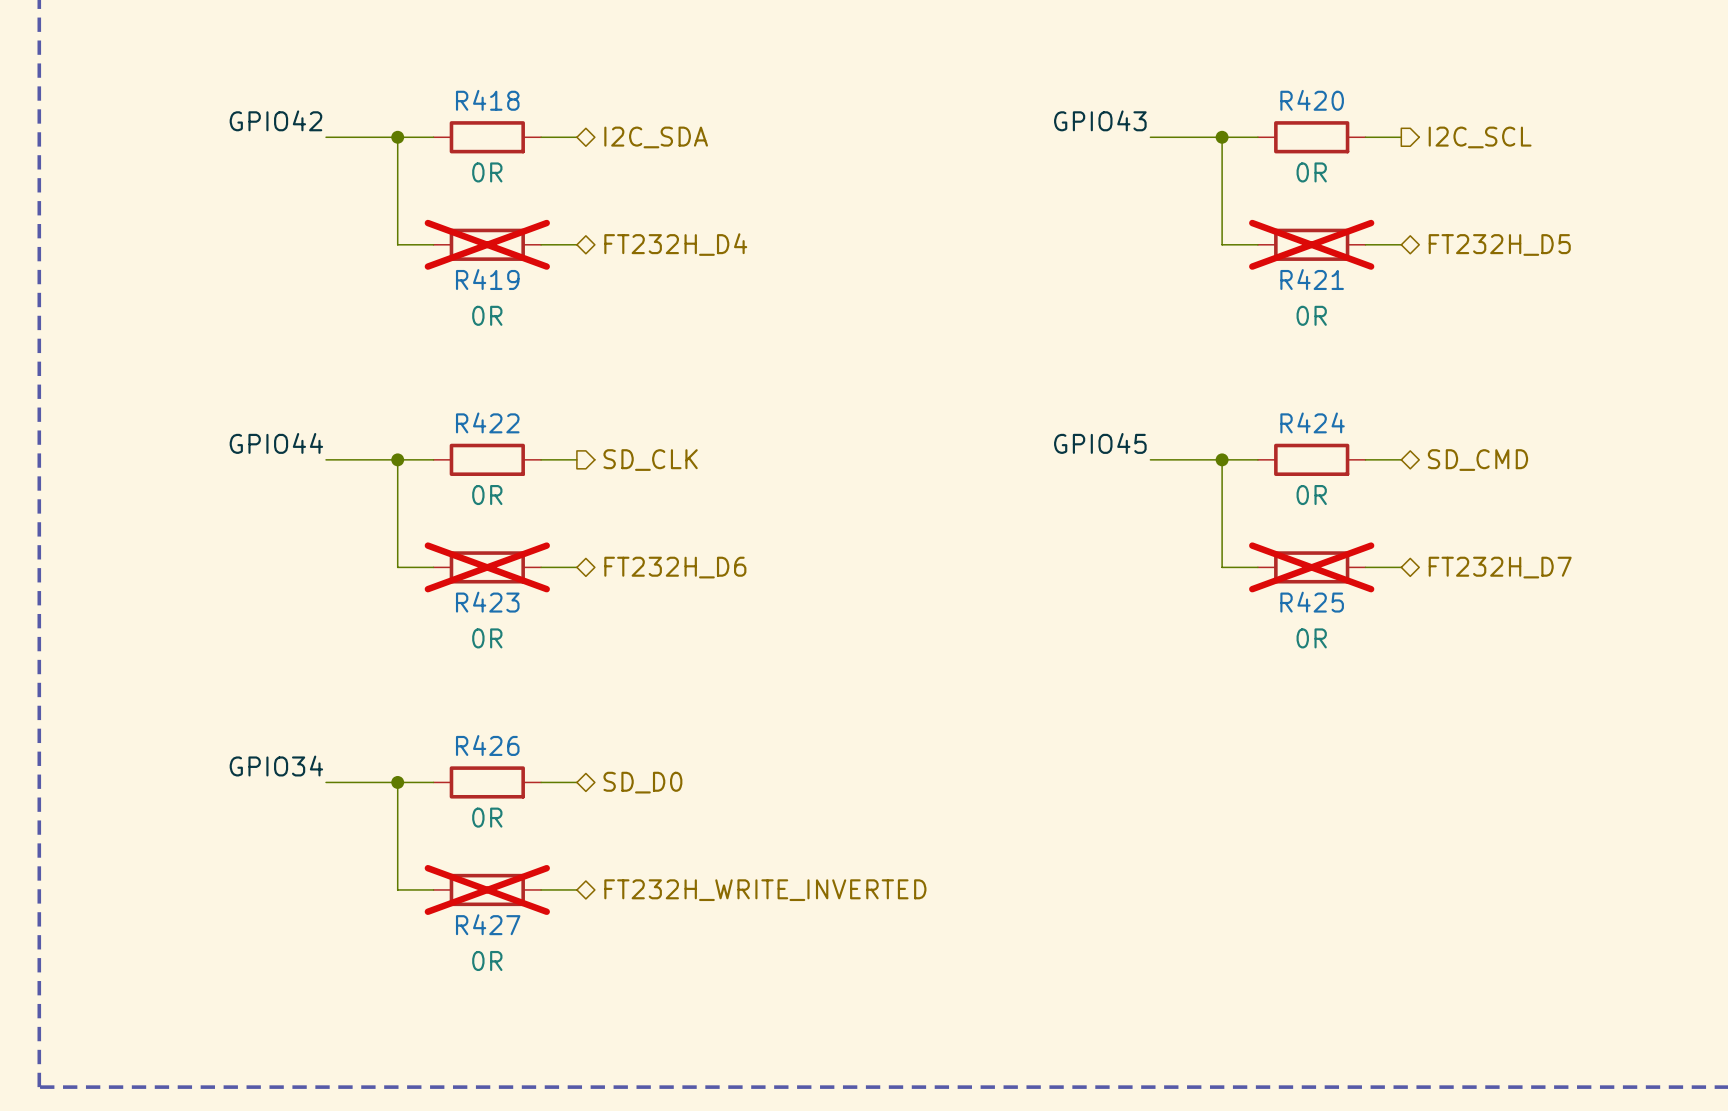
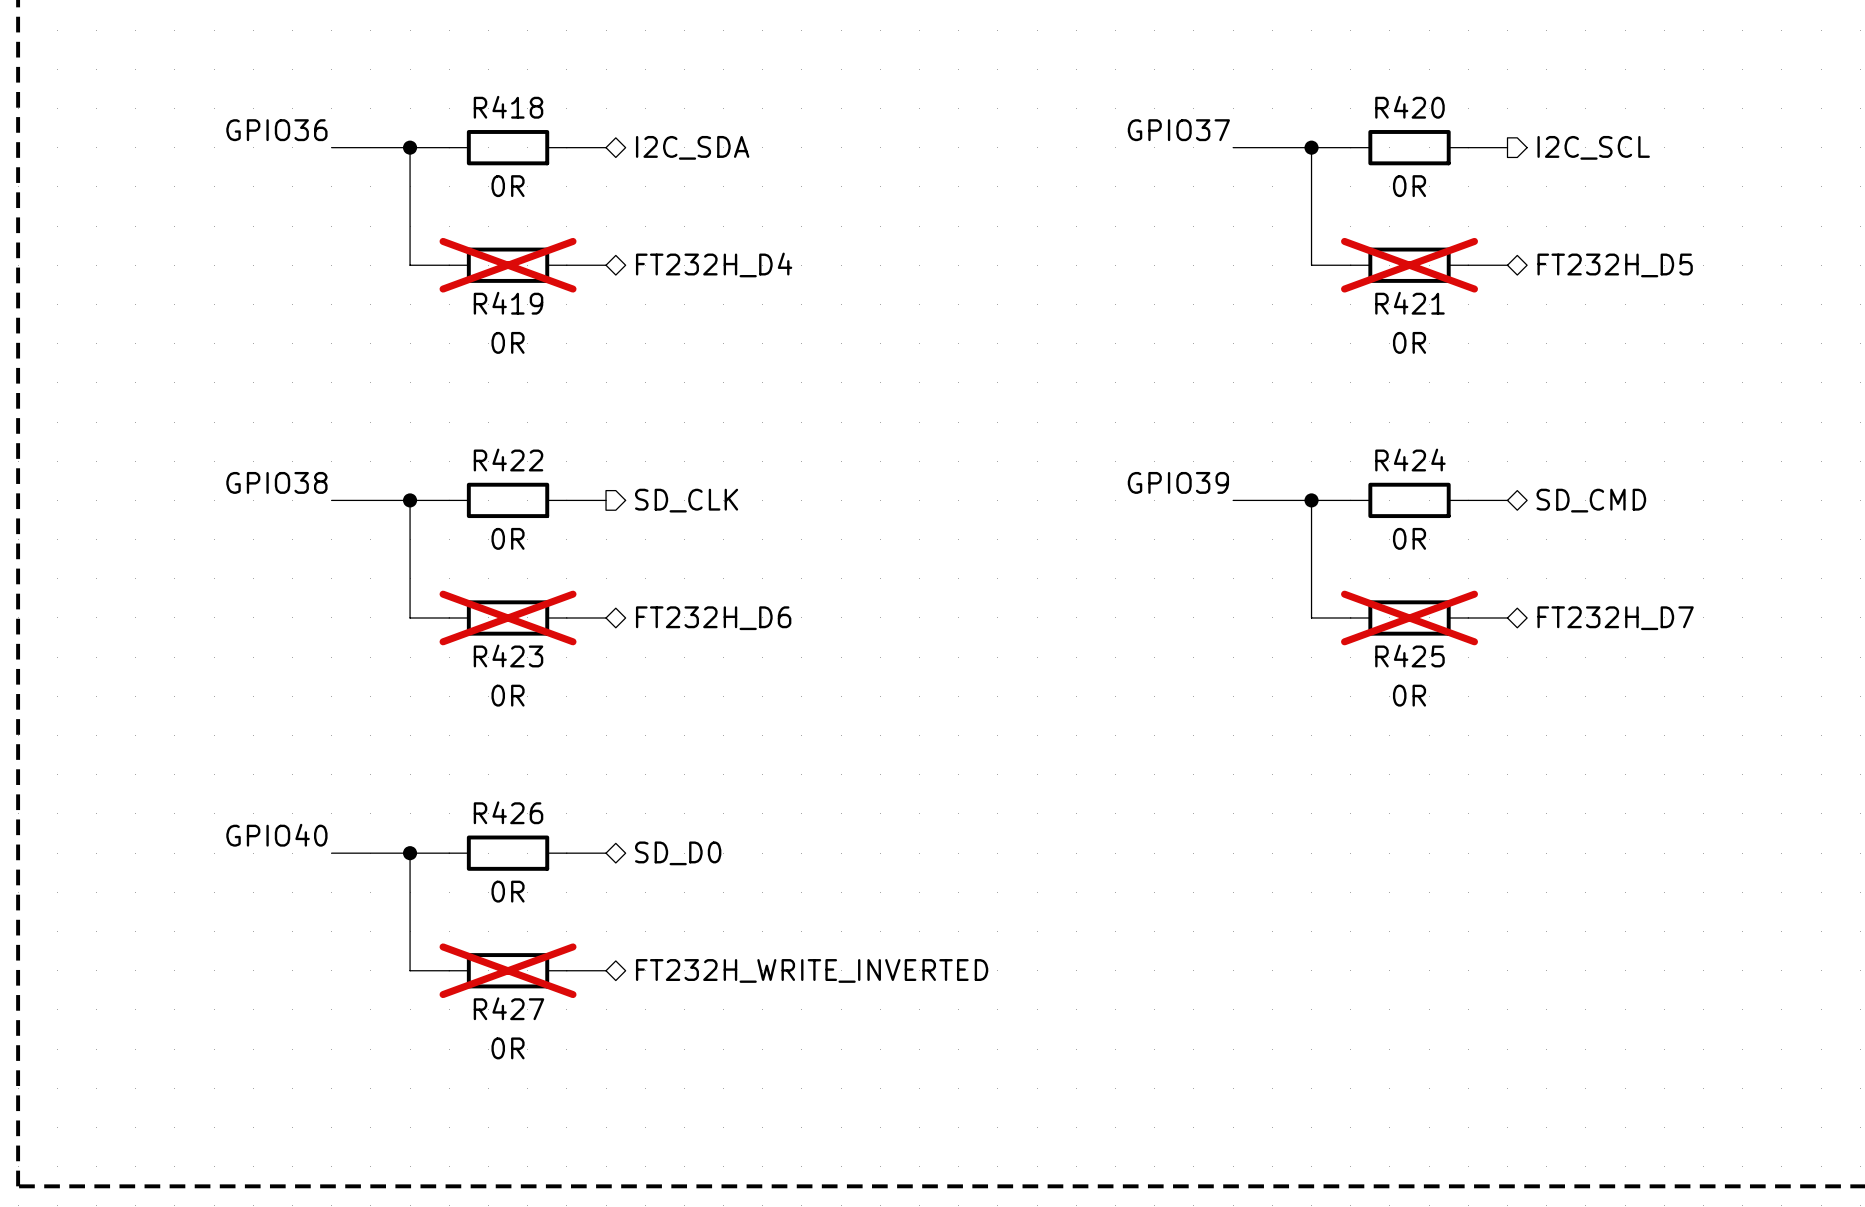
label: GPIO42 (275, 120) -> GPIO36 (276, 130)
label: GPIO43 (1100, 120) -> GPIO37 (1178, 130)
label: GPIO44 (276, 443) -> GPIO38 (276, 482)
label: GPIO45 (1100, 443) -> GPIO39 (1178, 482)
label: GPIO34 (276, 766) -> GPIO40 (276, 835)

